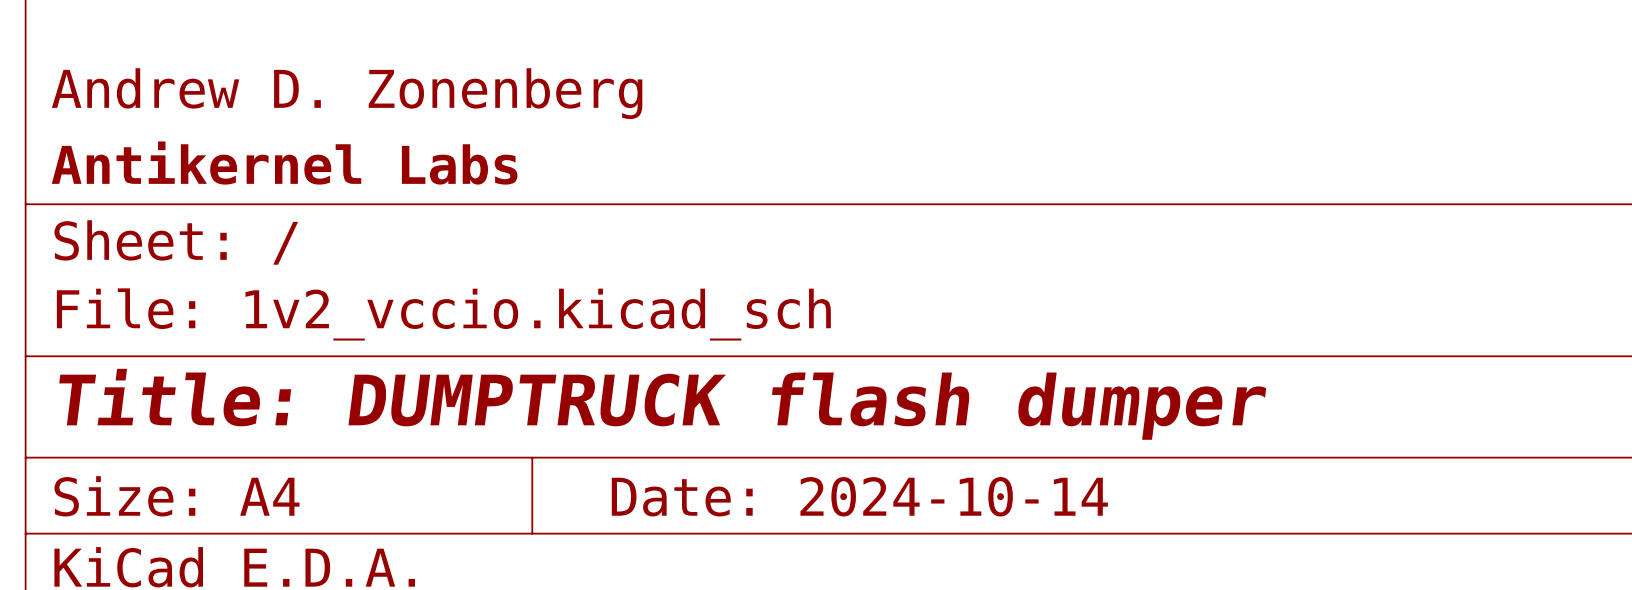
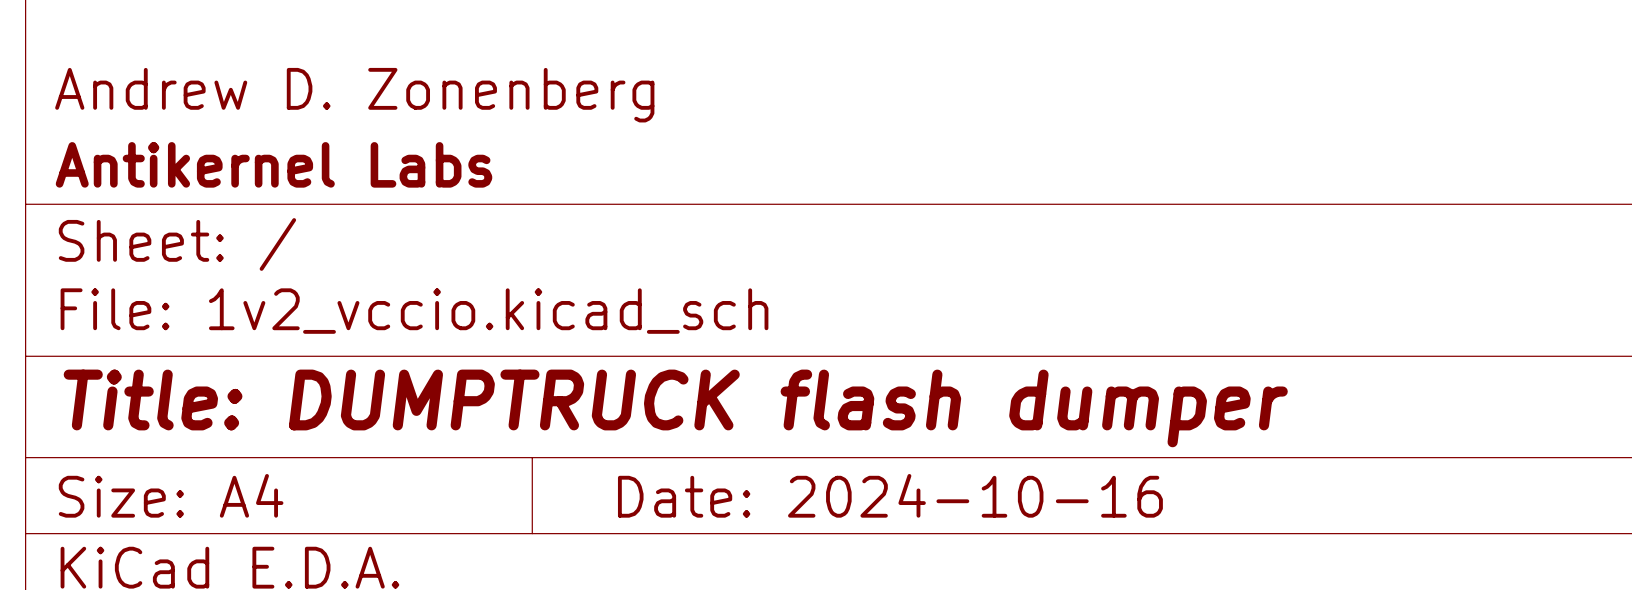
title block: Date: 2024-10-14 (859, 496) -> Date: 2024-10-16 (890, 495)

